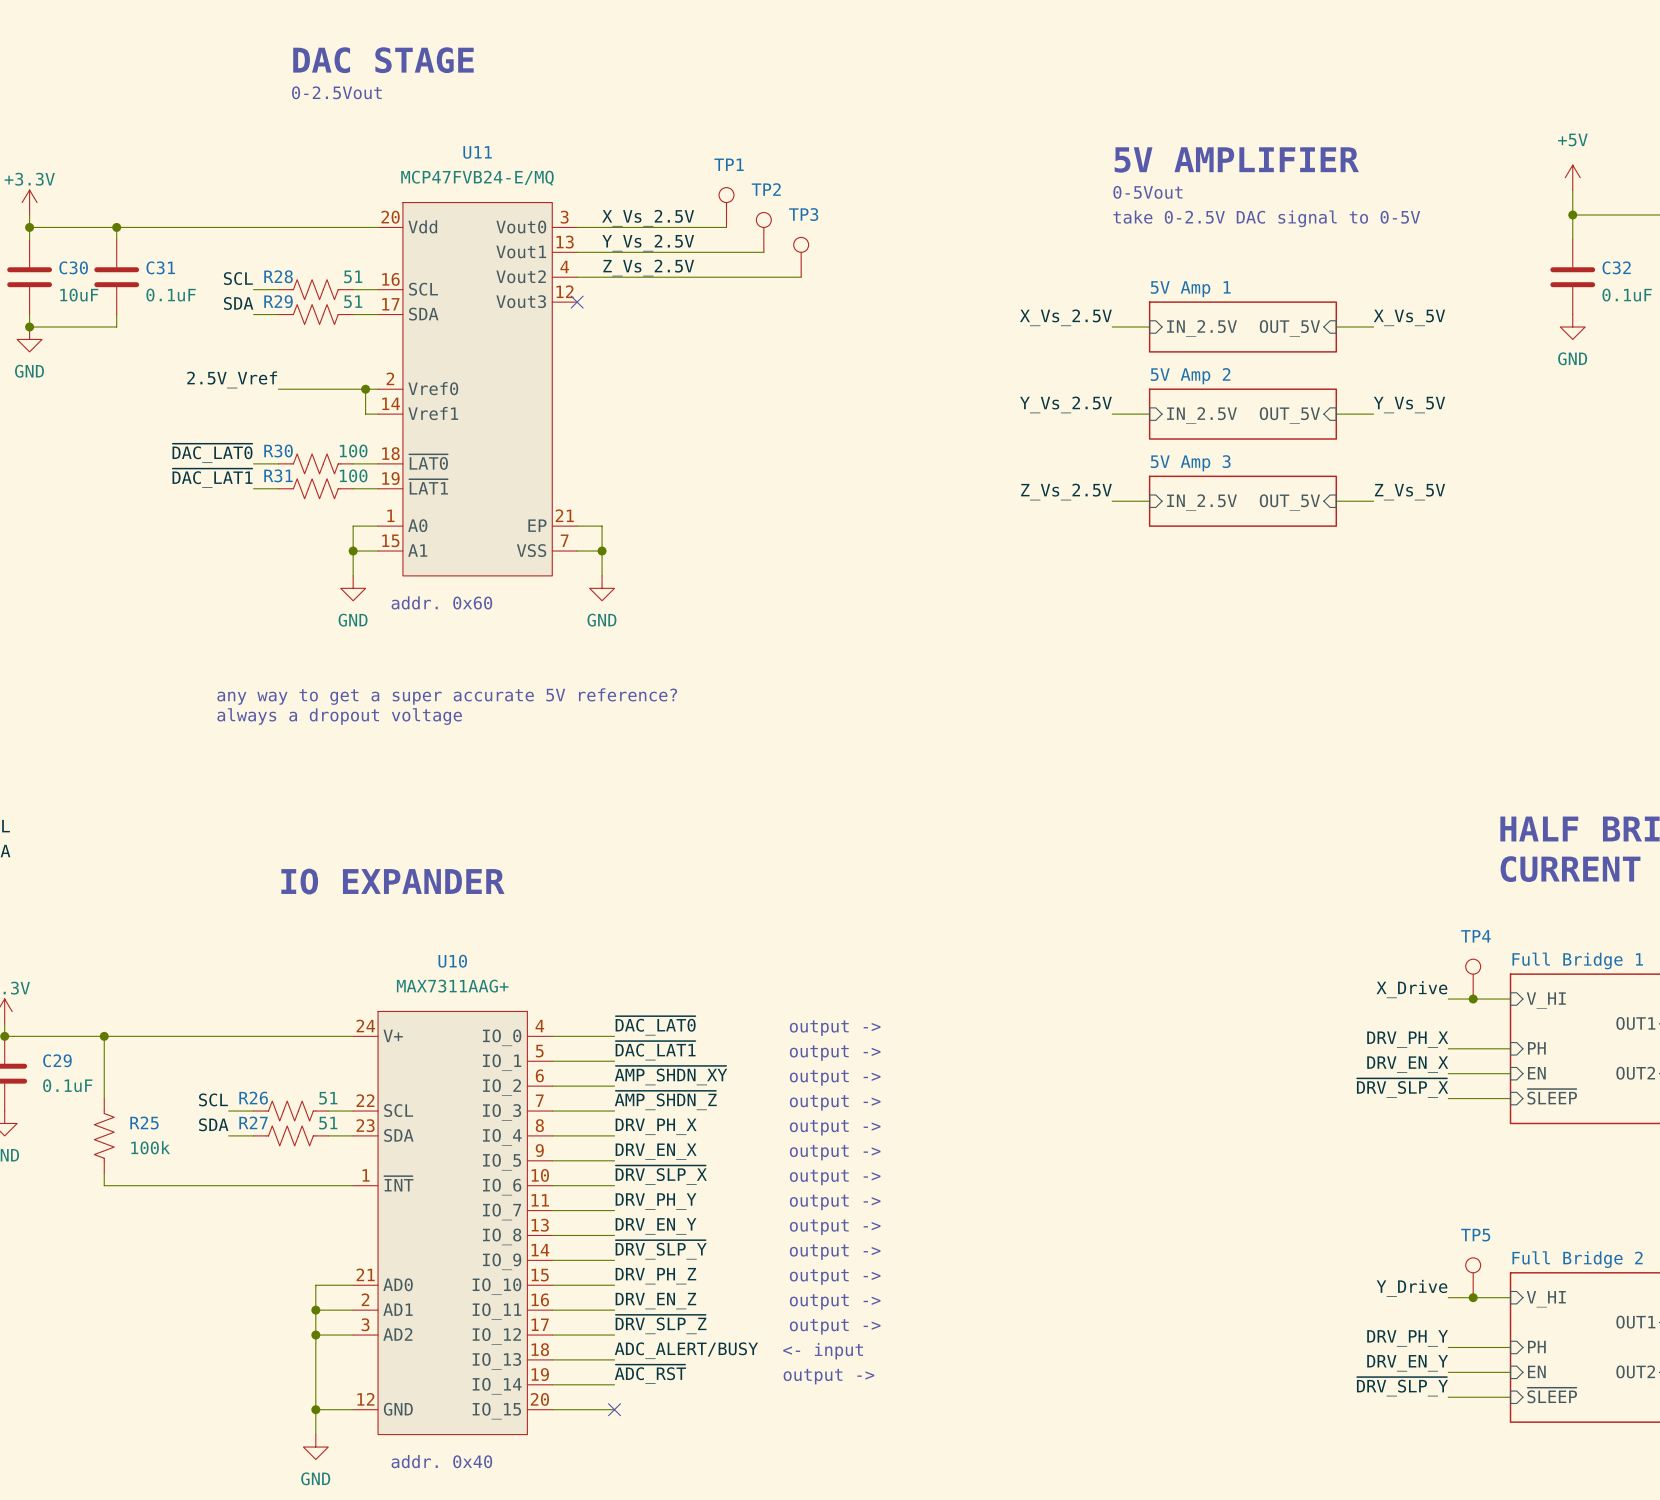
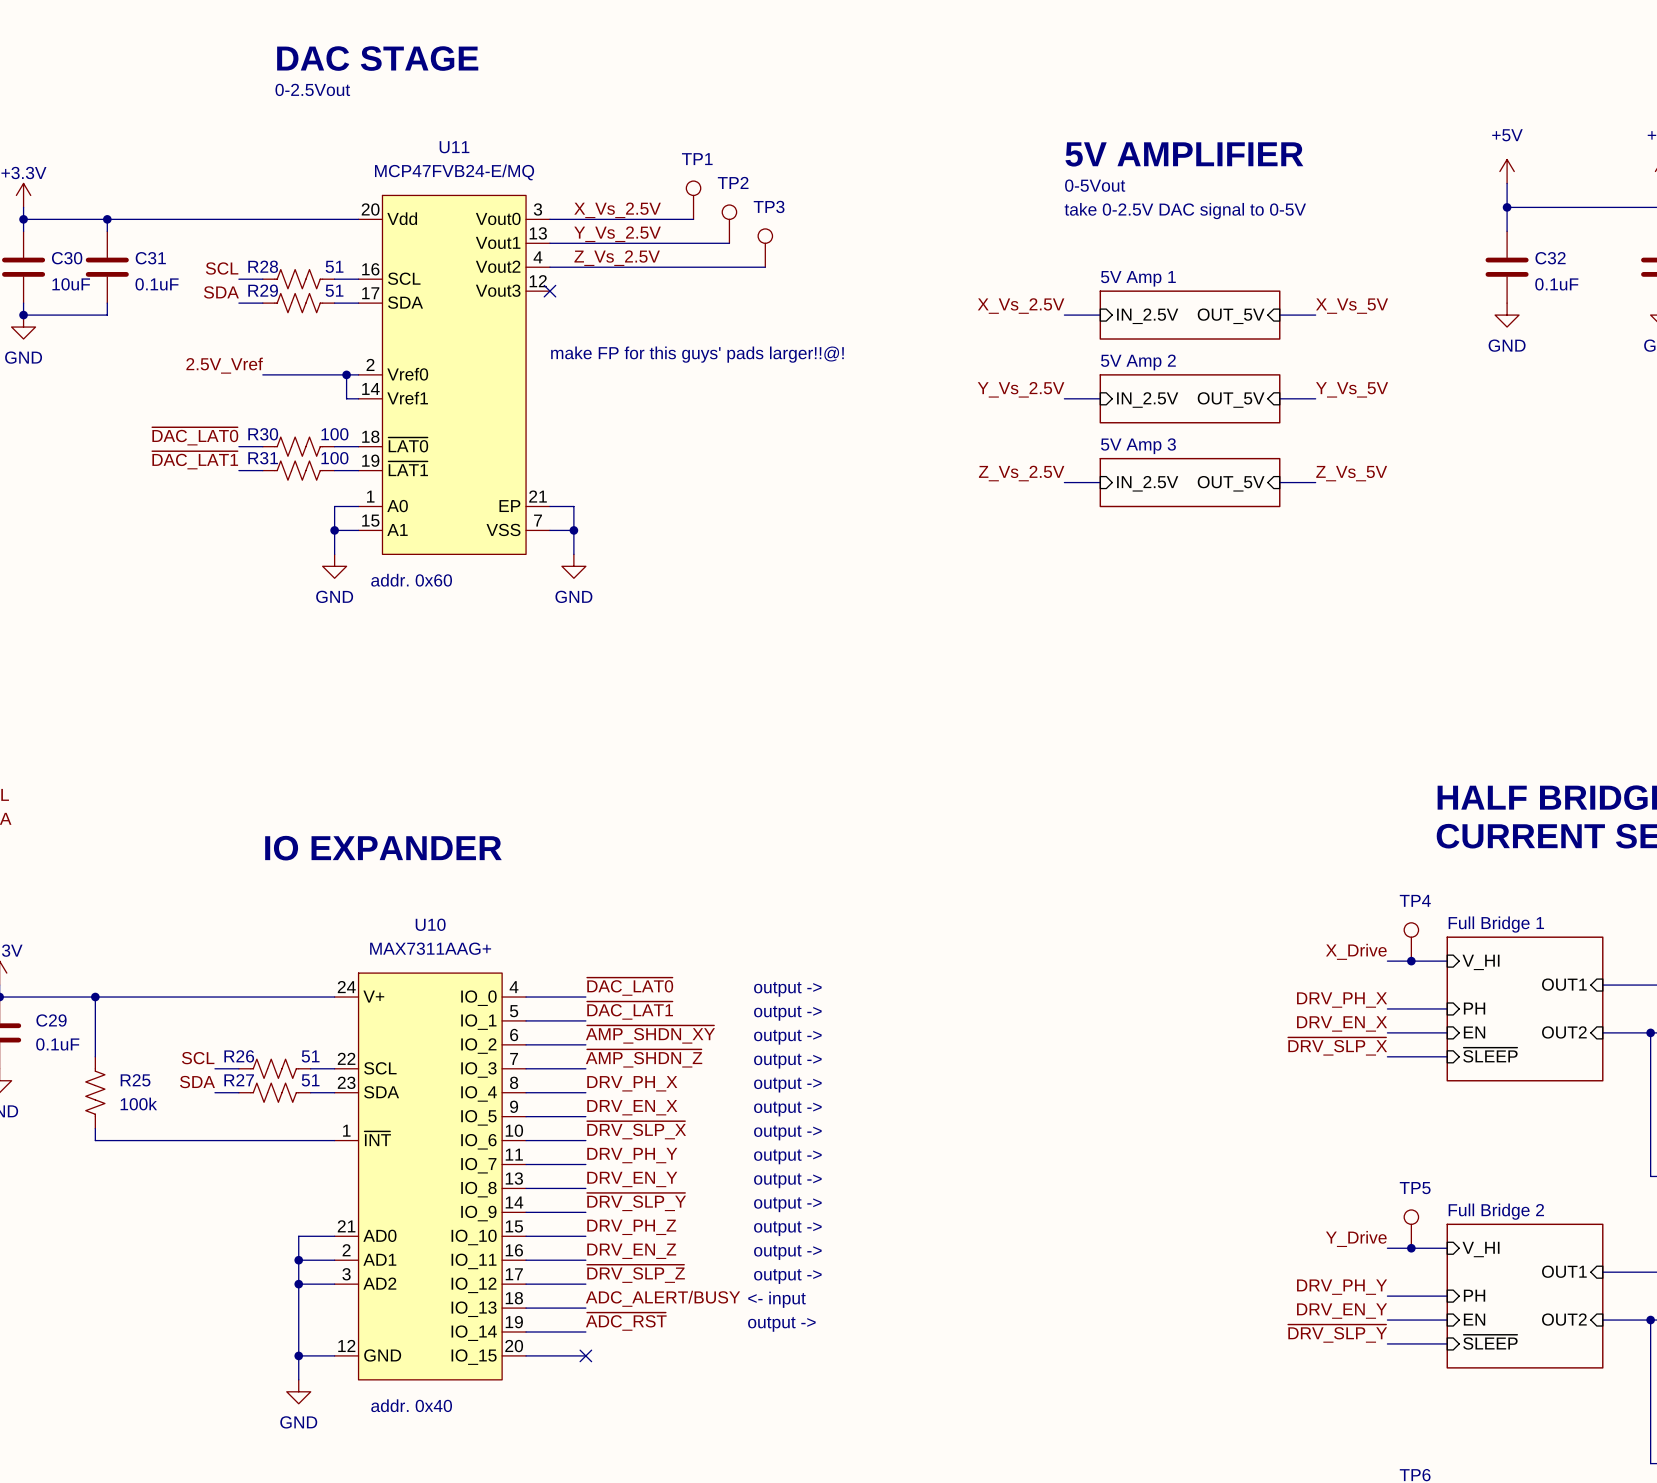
text: none -> make FP for this guys' pads larger!!@! (697, 354)
text: any way to get a super accurate 5V reference? (447, 696) -> none
text: always a dropout voltage (339, 716) -> none

